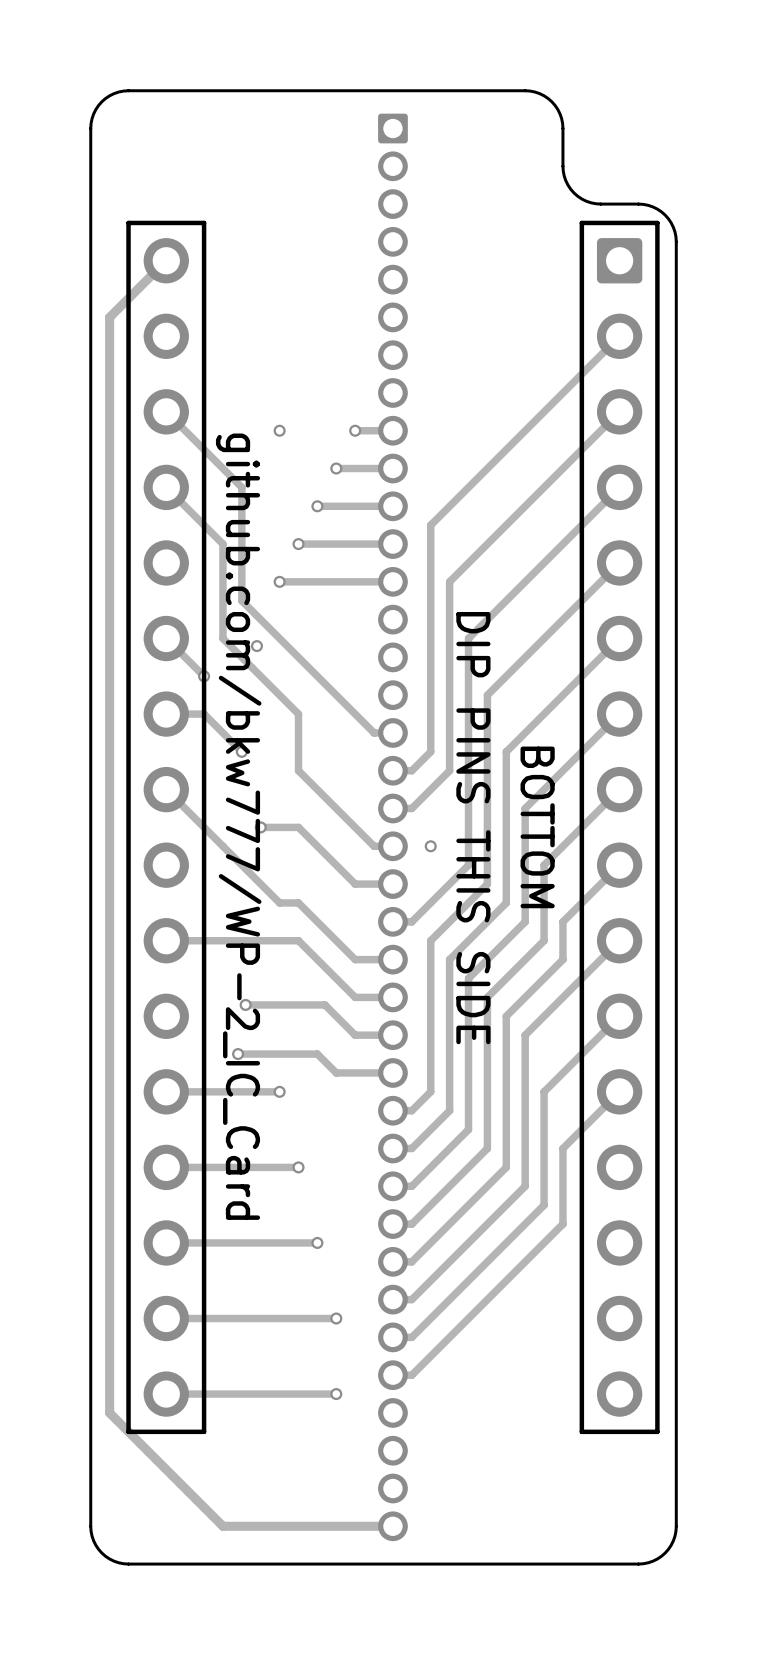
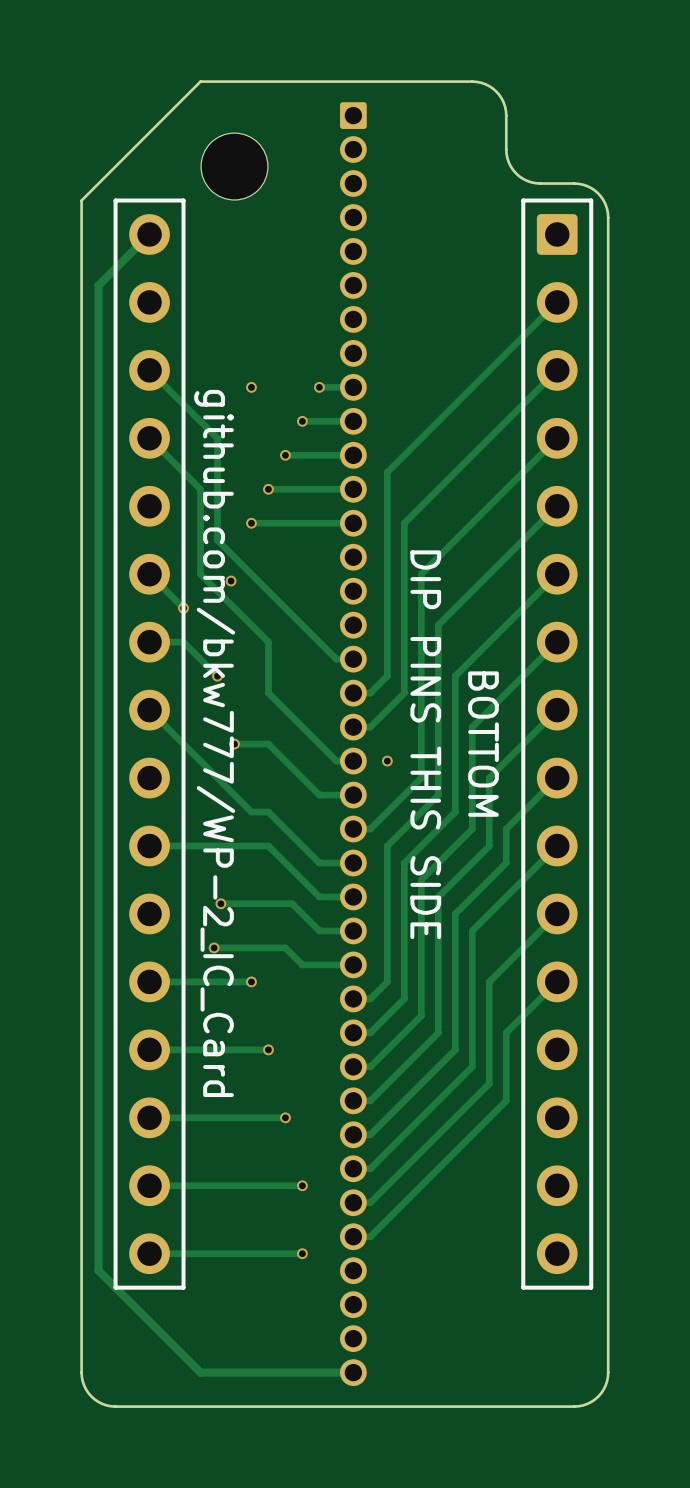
board edge: (222, 90) (123, 91) (109, 95) (101, 101) (93, 114) (91, 123) (90, 222) -> (200, 81) (81, 200)
part: none -> (234, 166)

